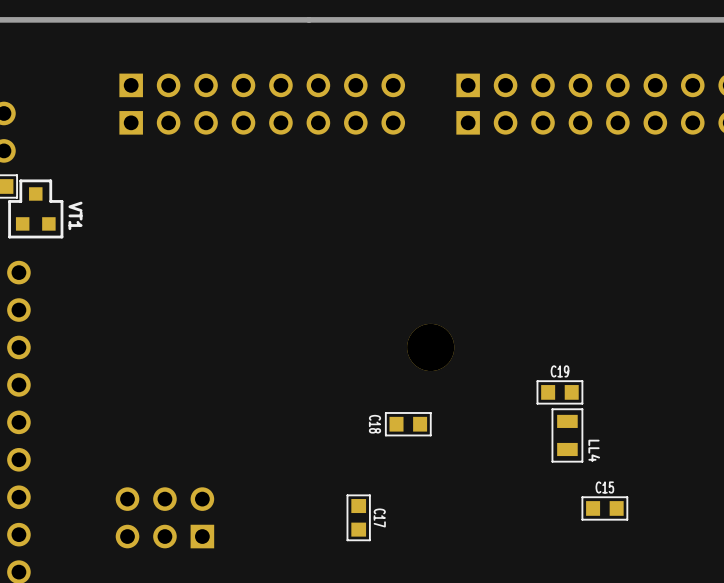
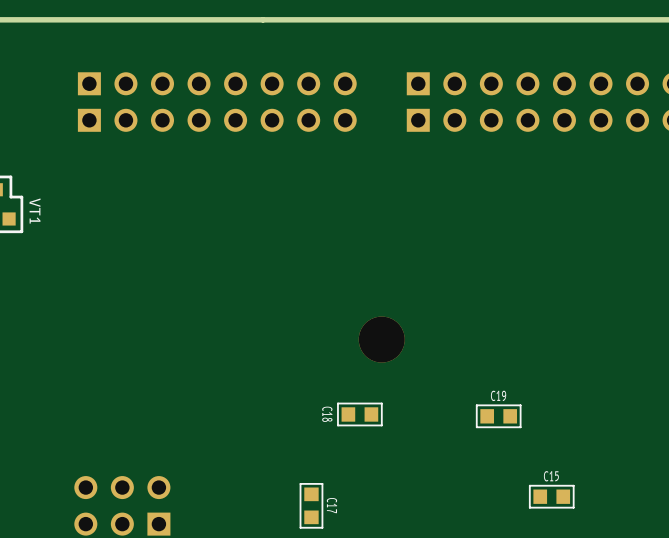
C19 position: (559, 392) -> (498, 416)
LL4: (567, 435) -> none

